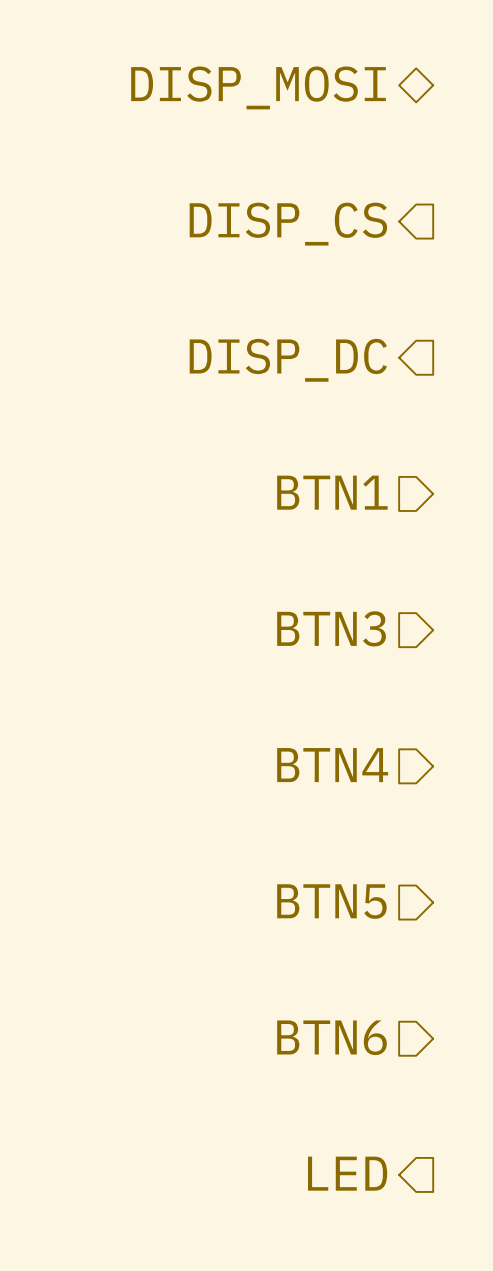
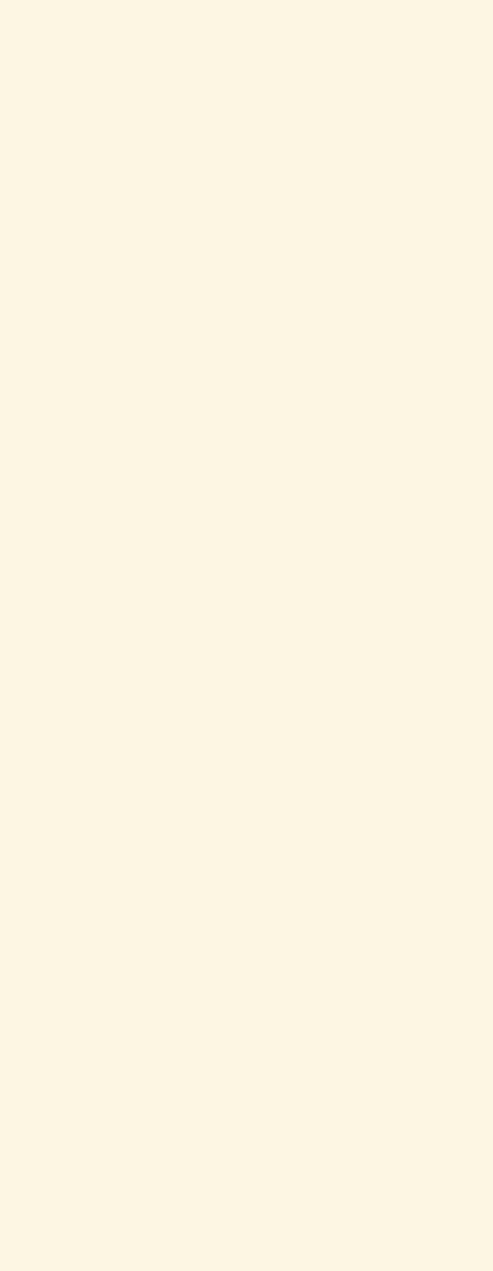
hierarchical label: DISP_MOSI (258, 87) -> none
hierarchical label: DISP_CS (288, 224) -> none
hierarchical label: DISP_DC (288, 360) -> none
hierarchical label: BTN1 (332, 492) -> none
hierarchical label: BTN3 (331, 628) -> none
hierarchical label: BTN4 (332, 765) -> none
hierarchical label: BTN5 (331, 901) -> none
hierarchical label: BTN6 (331, 1037) -> none
hierarchical label: LED (347, 1173) -> none

